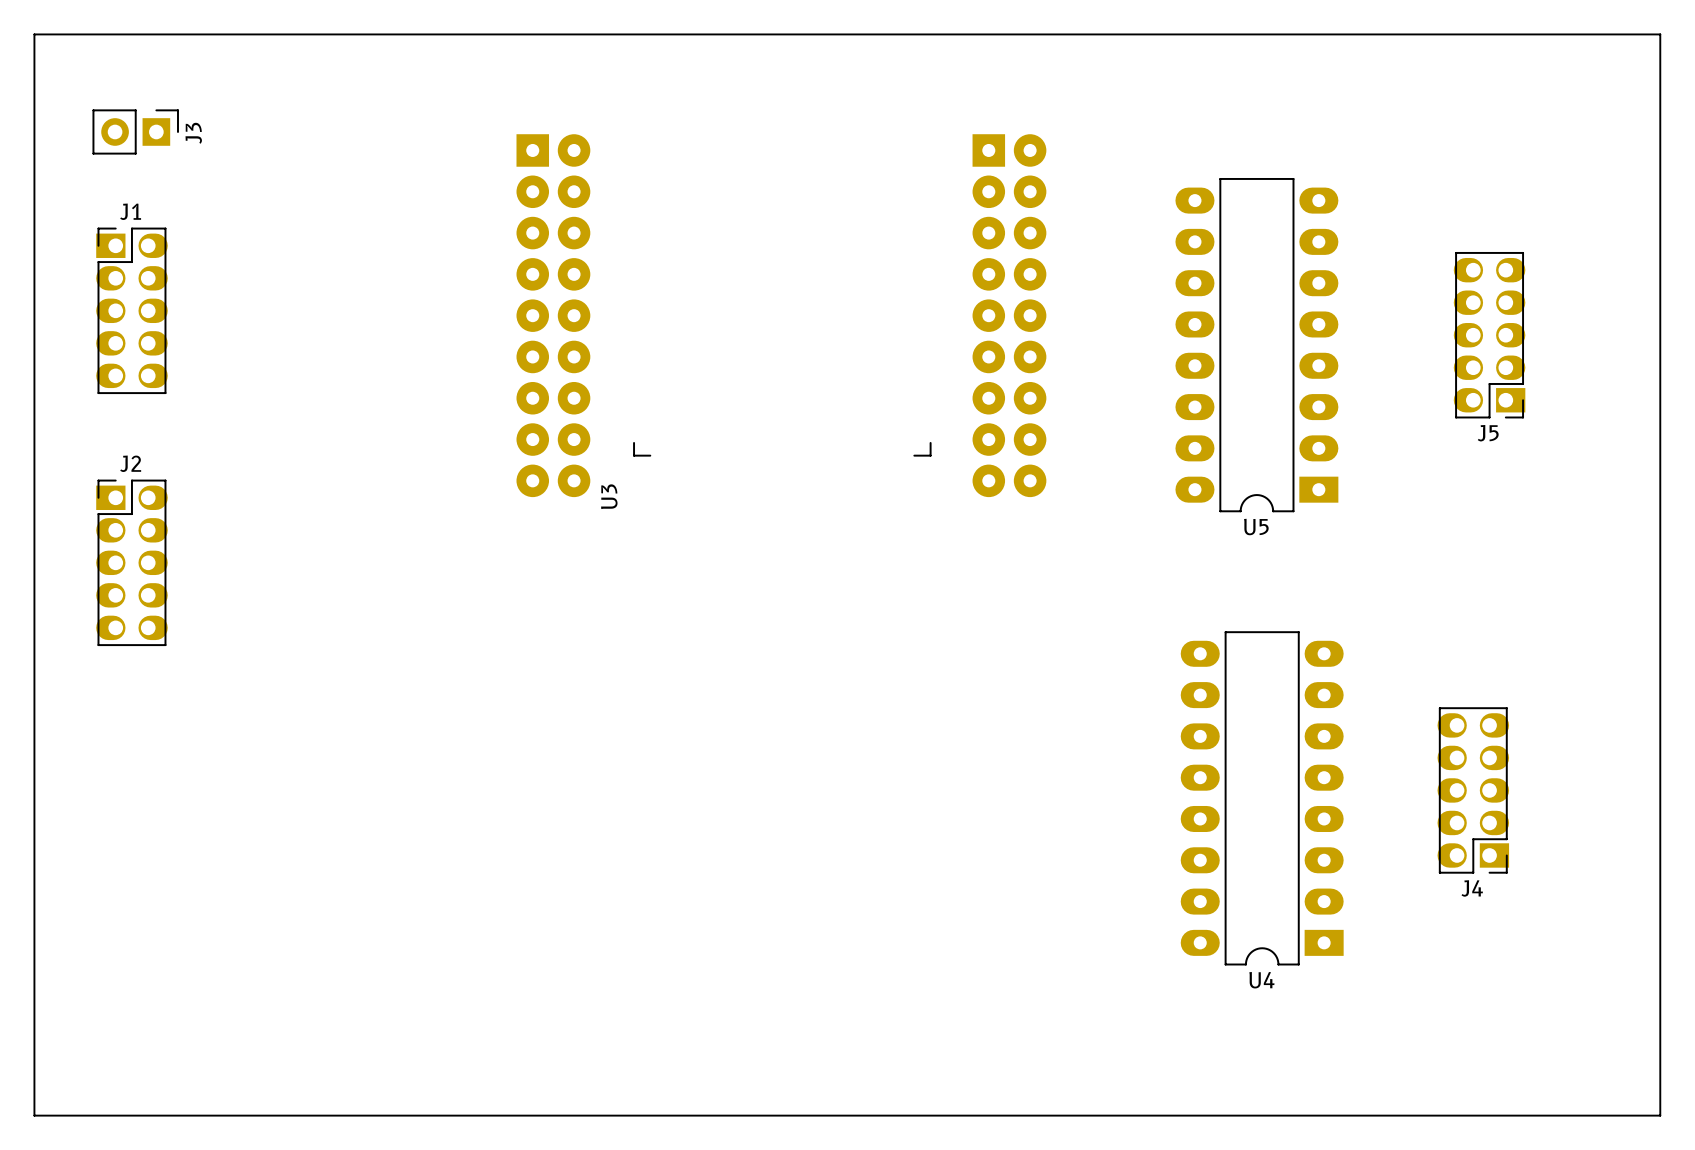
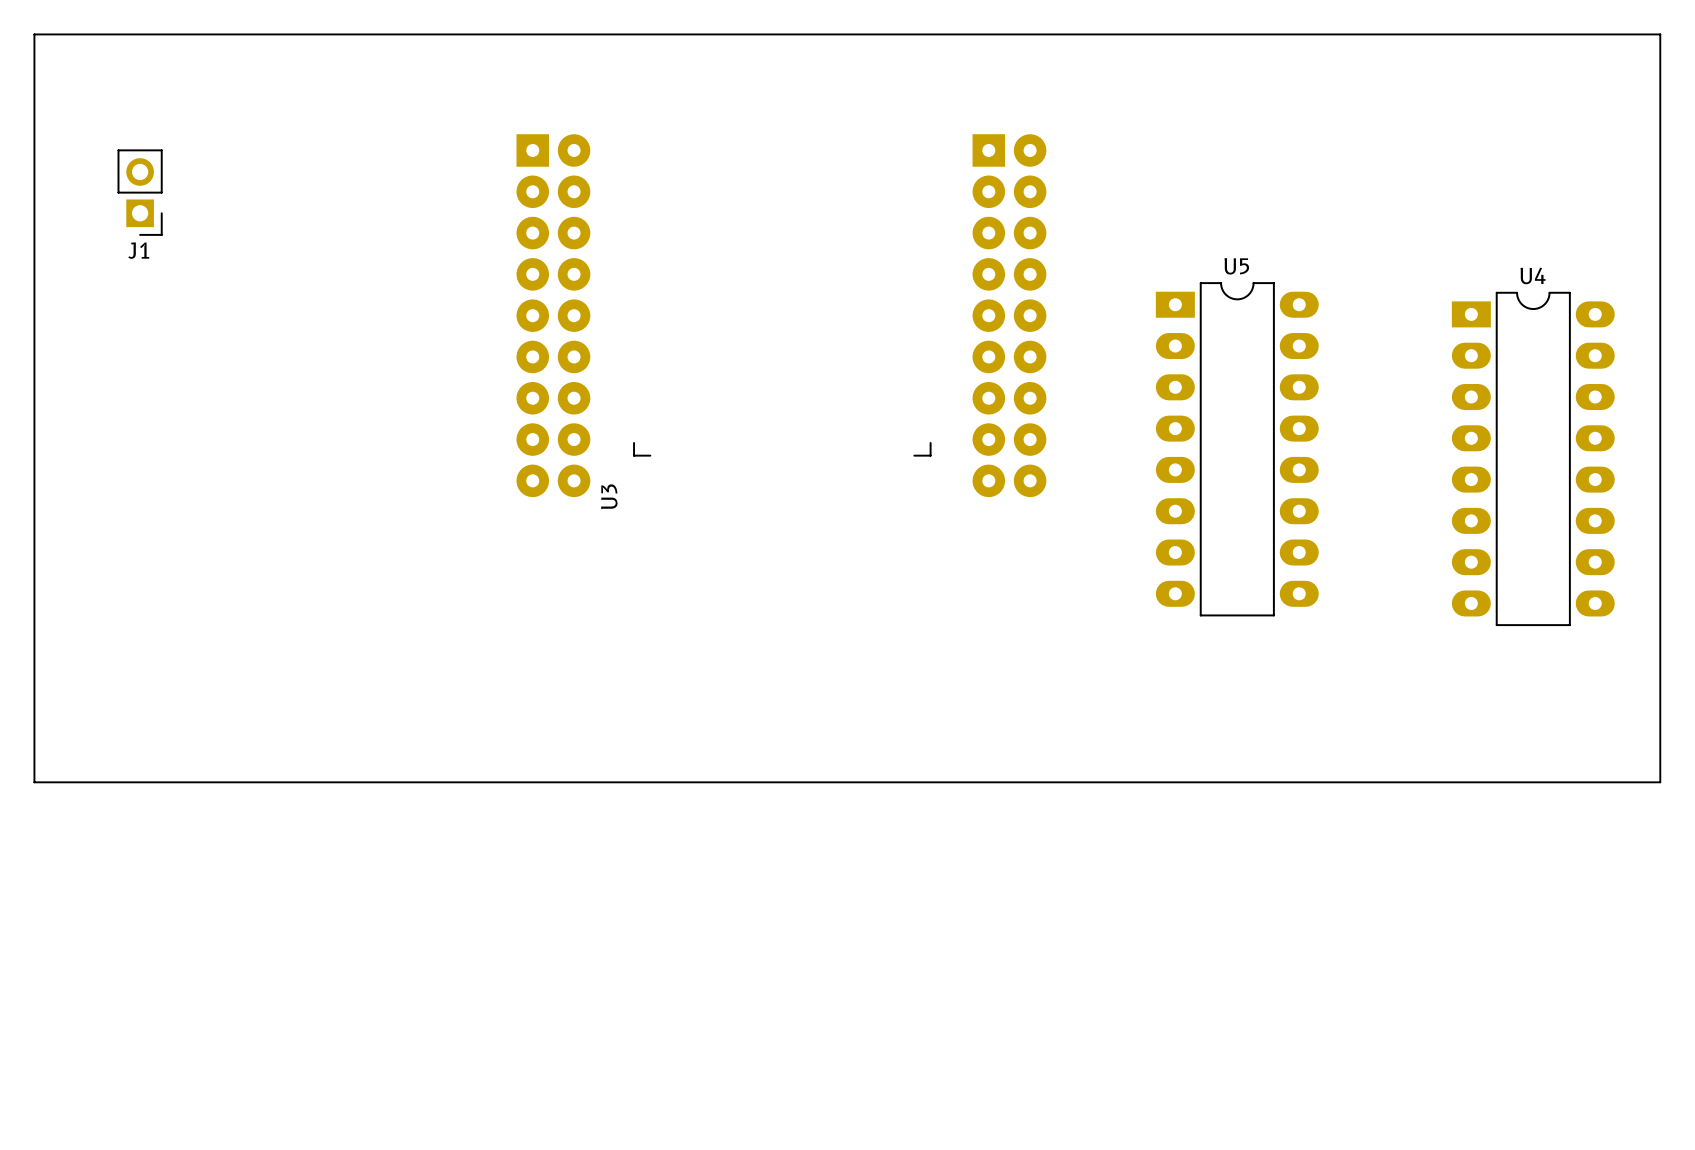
J3: (135, 131) -> none
J1 name position: J1 (130, 211) -> J1 (138, 250)
J1 footprint: [96, 227, 168, 395] -> [117, 149, 163, 236]
J5: (1489, 335) -> none
U5 rotation: 0° (1256, 345) -> 180° (1237, 449)
J2: (131, 562) -> none
board edge: (34, 782) (34, 1115) (1660, 1115) (1660, 782) -> (34, 782) (1660, 782)
J4: (1473, 790) -> none
U4 rotation: 0° (1262, 798) -> 180° (1533, 458)
U4 position: (1262, 798) -> (1533, 458)

